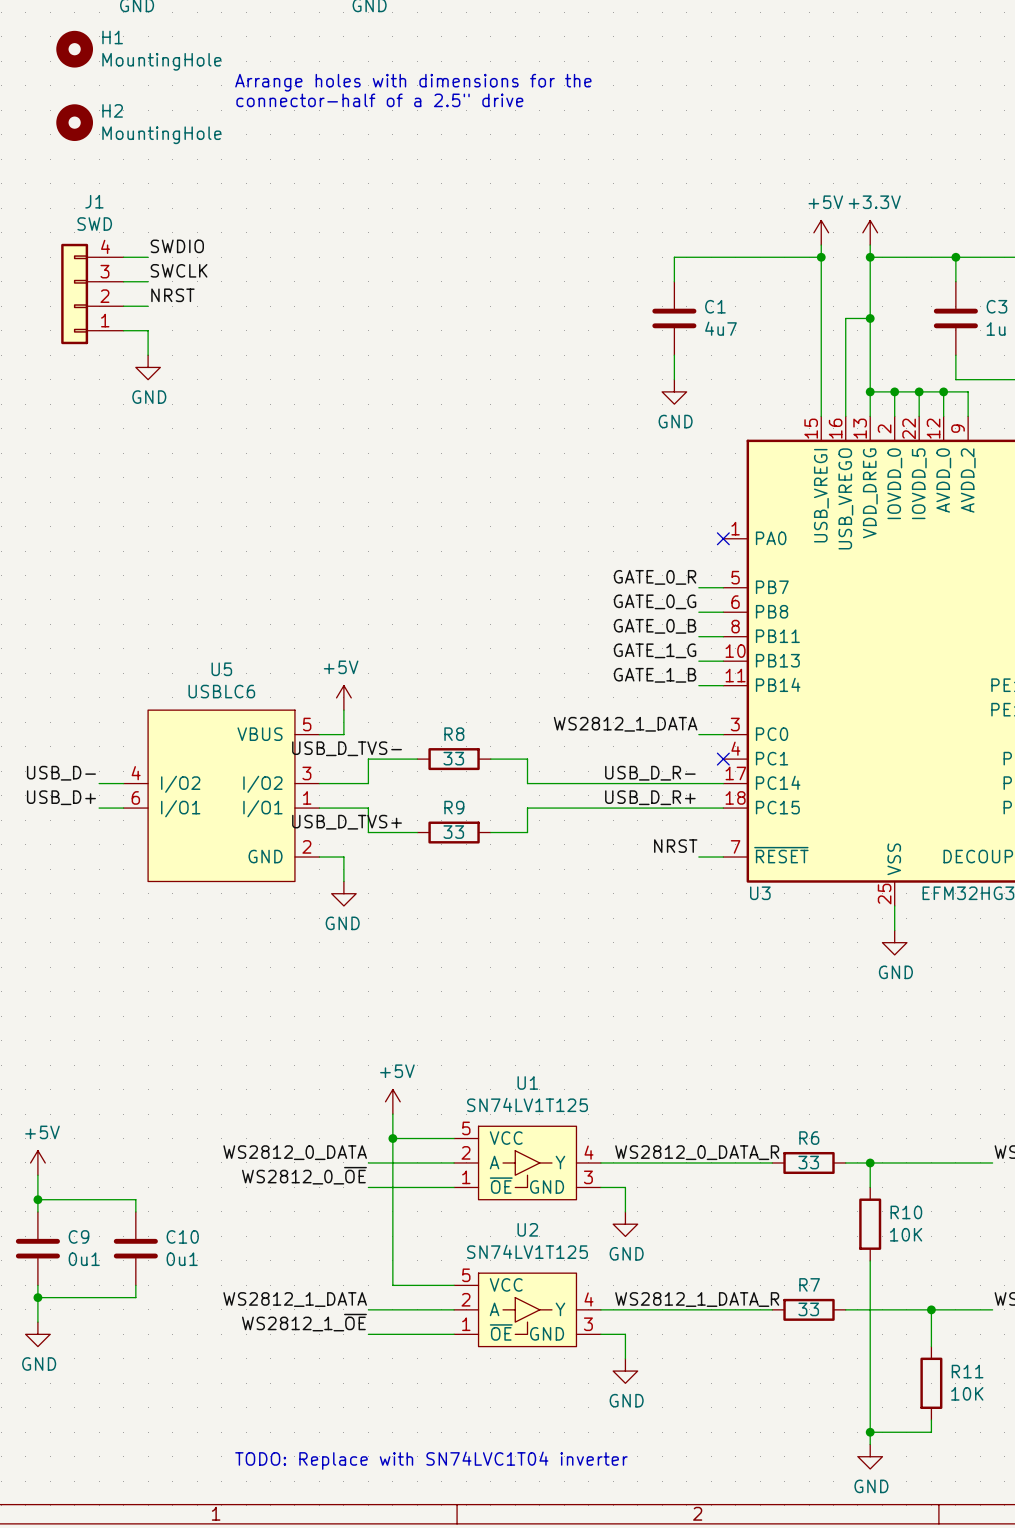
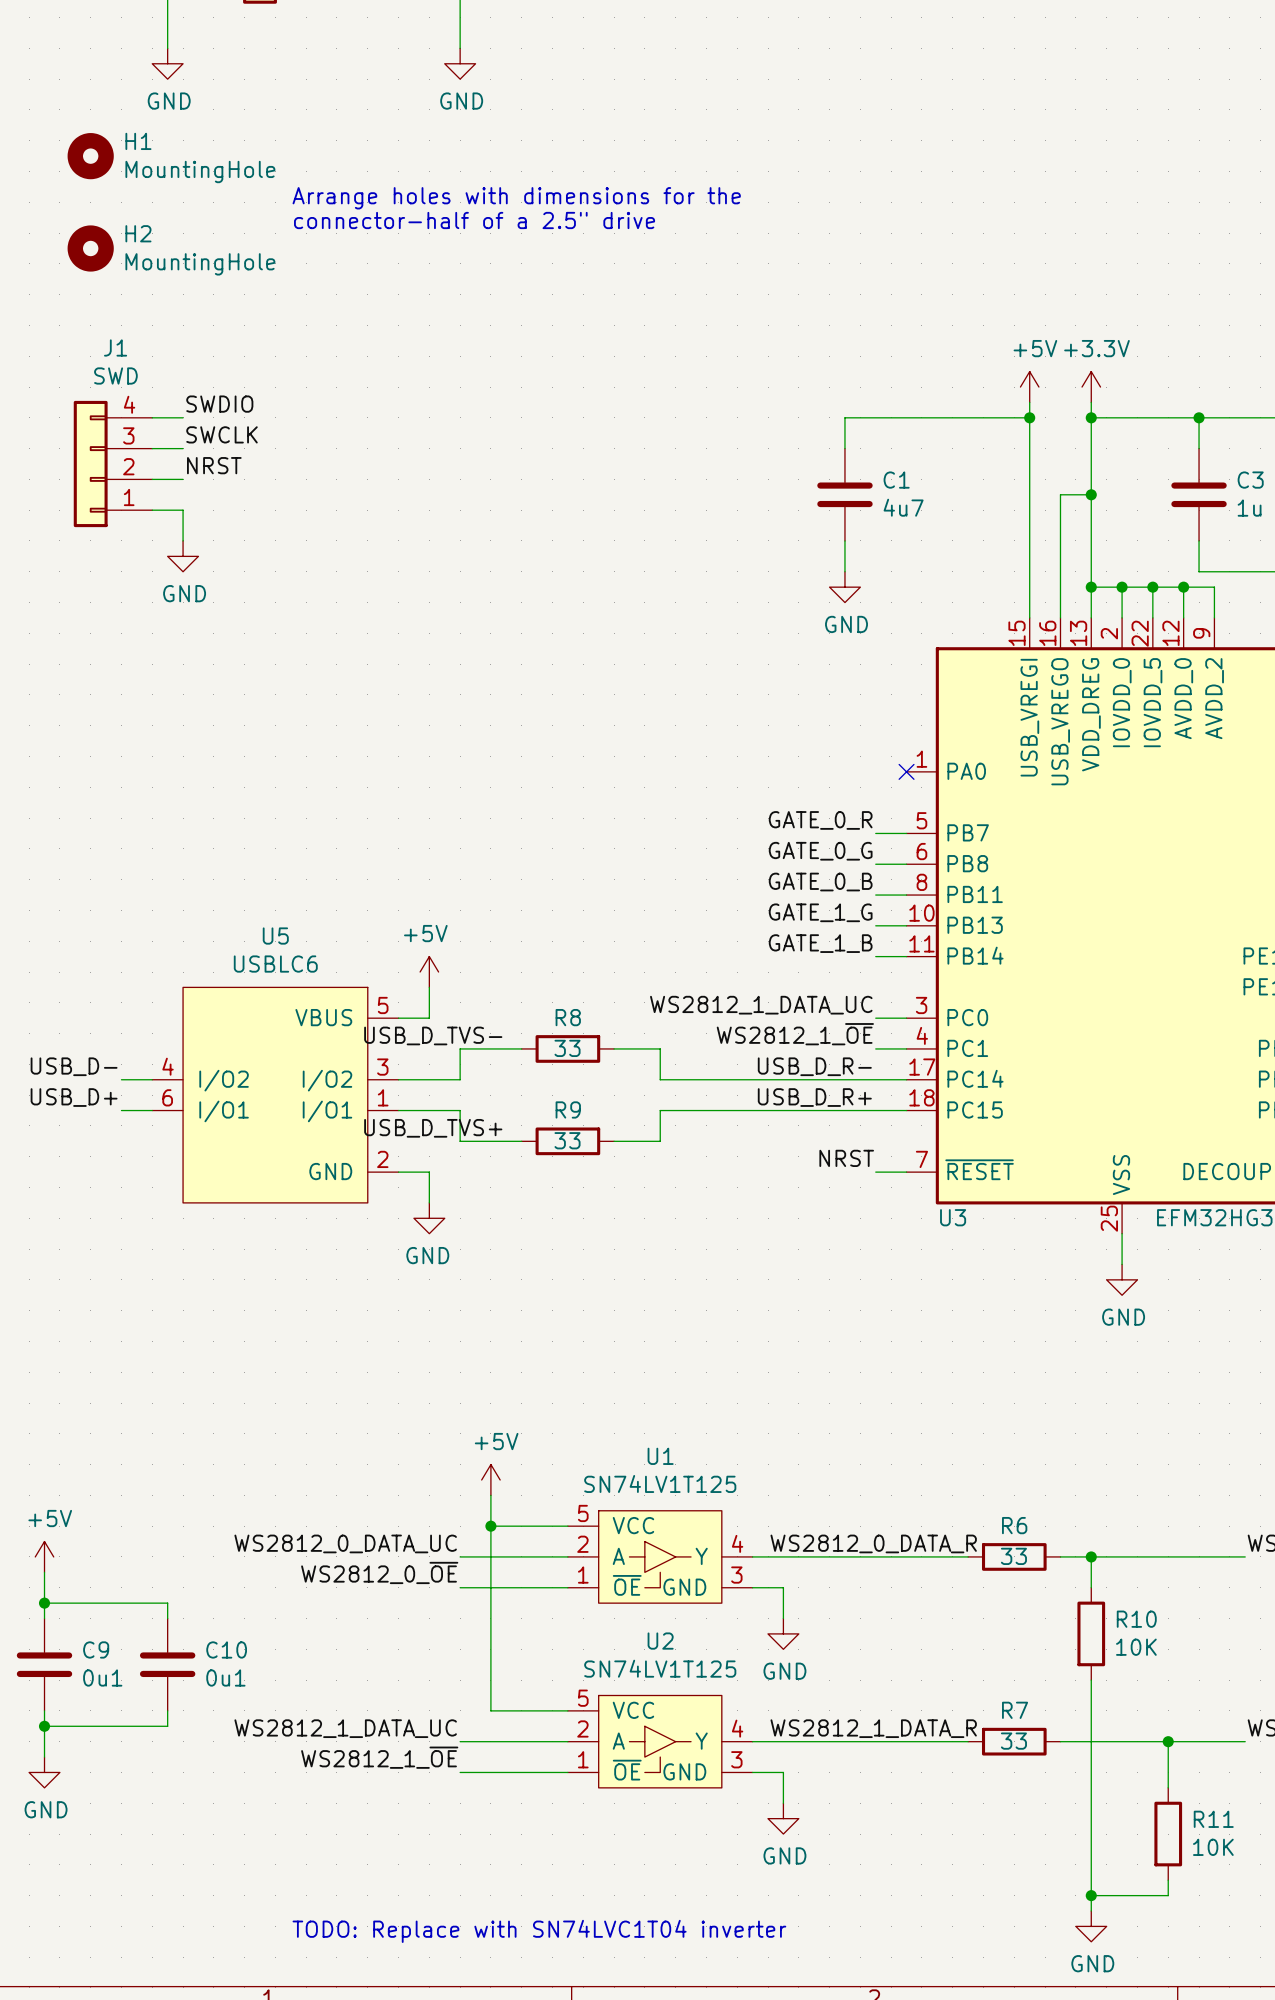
label: WS2812_1_DATA (625, 724) -> WS2812_1_DATA_UC (761, 1005)
label: none -> WS2812_1_~{OE} (795, 1034)
wire: none -> (875, 1048) (906, 1048)
no-connect mark: (723, 759) -> none
label: WS2812_0_DATA (295, 1152) -> WS2812_0_DATA_UC (345, 1543)
label: WS2812_1_DATA (295, 1299) -> WS2812_1_DATA_UC (345, 1728)

